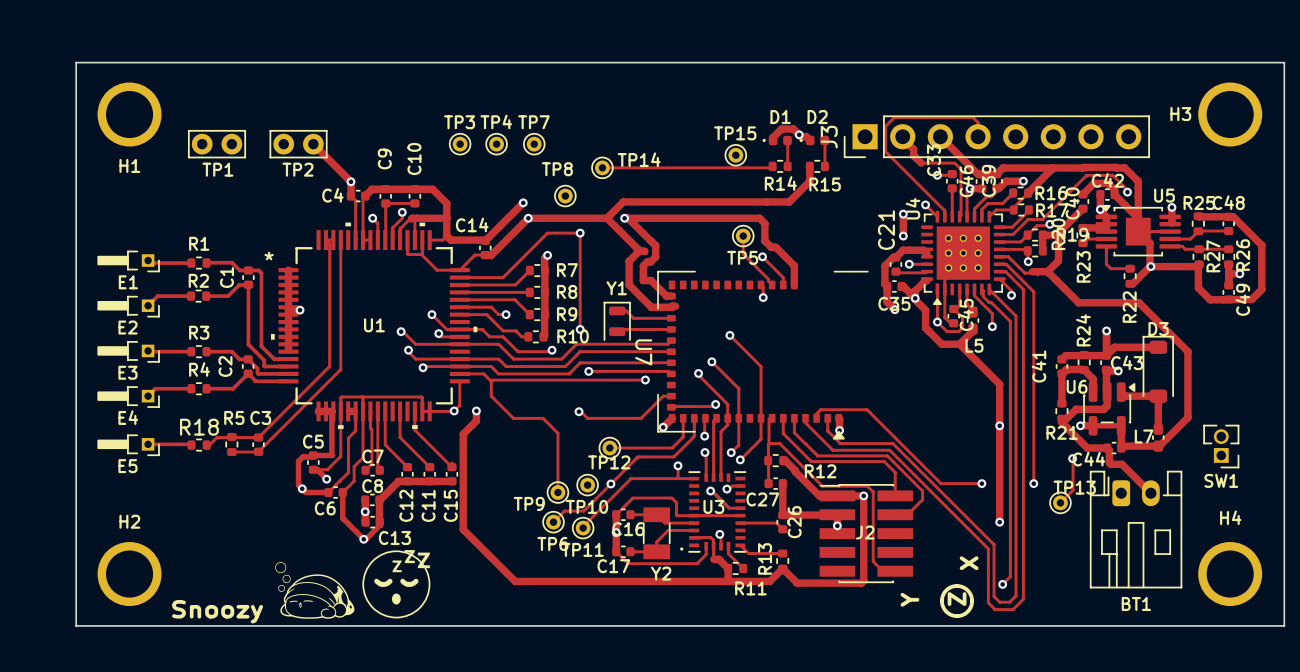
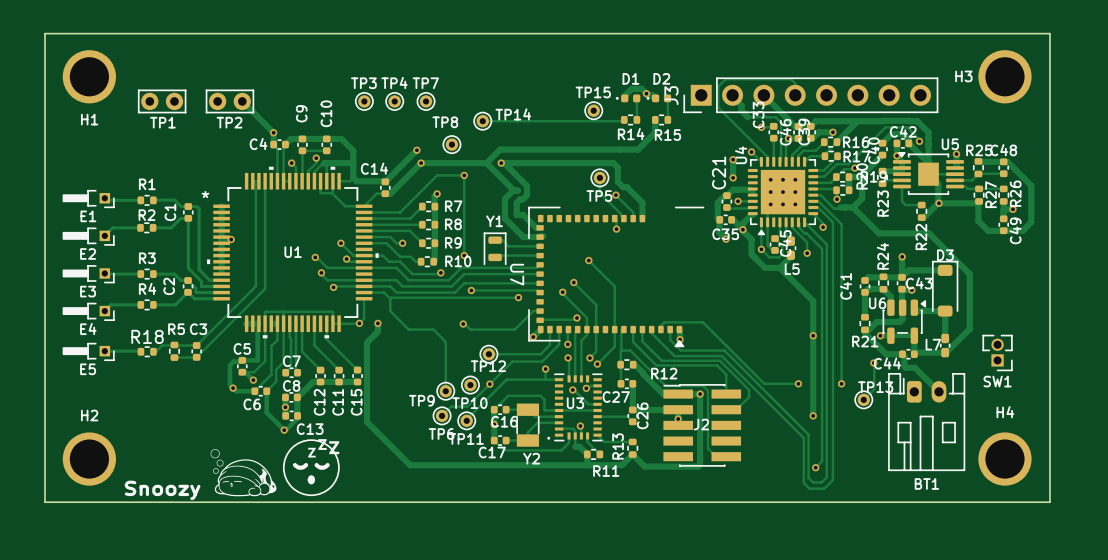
text: X (969, 563) -> none
line: (957, 586) (967, 590) (972, 601) (967, 611) (957, 616) (946, 611) (941, 601) (946, 590) (957, 586) -> none
text: Y (909, 599) -> none
text: Z (957, 599) -> none

